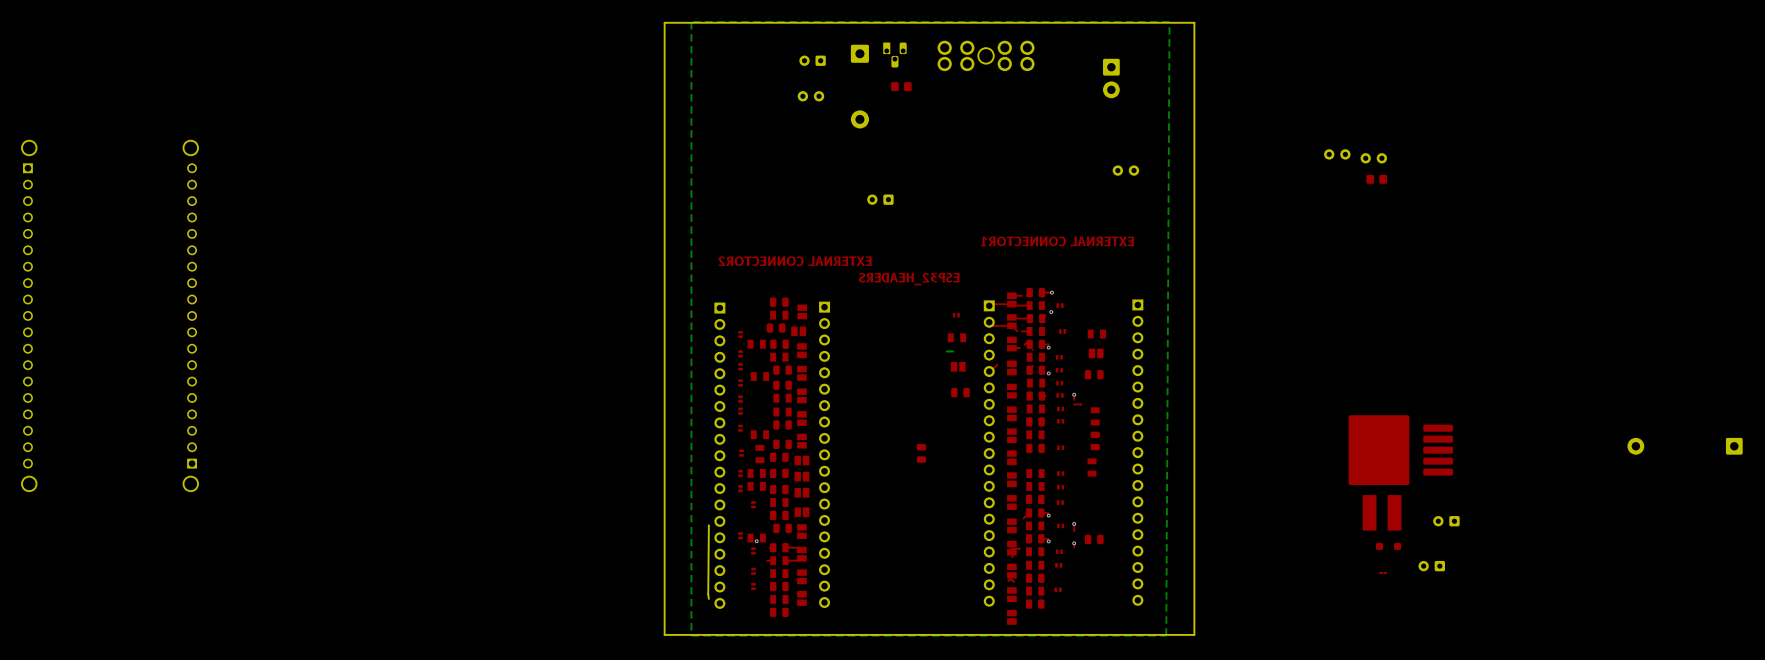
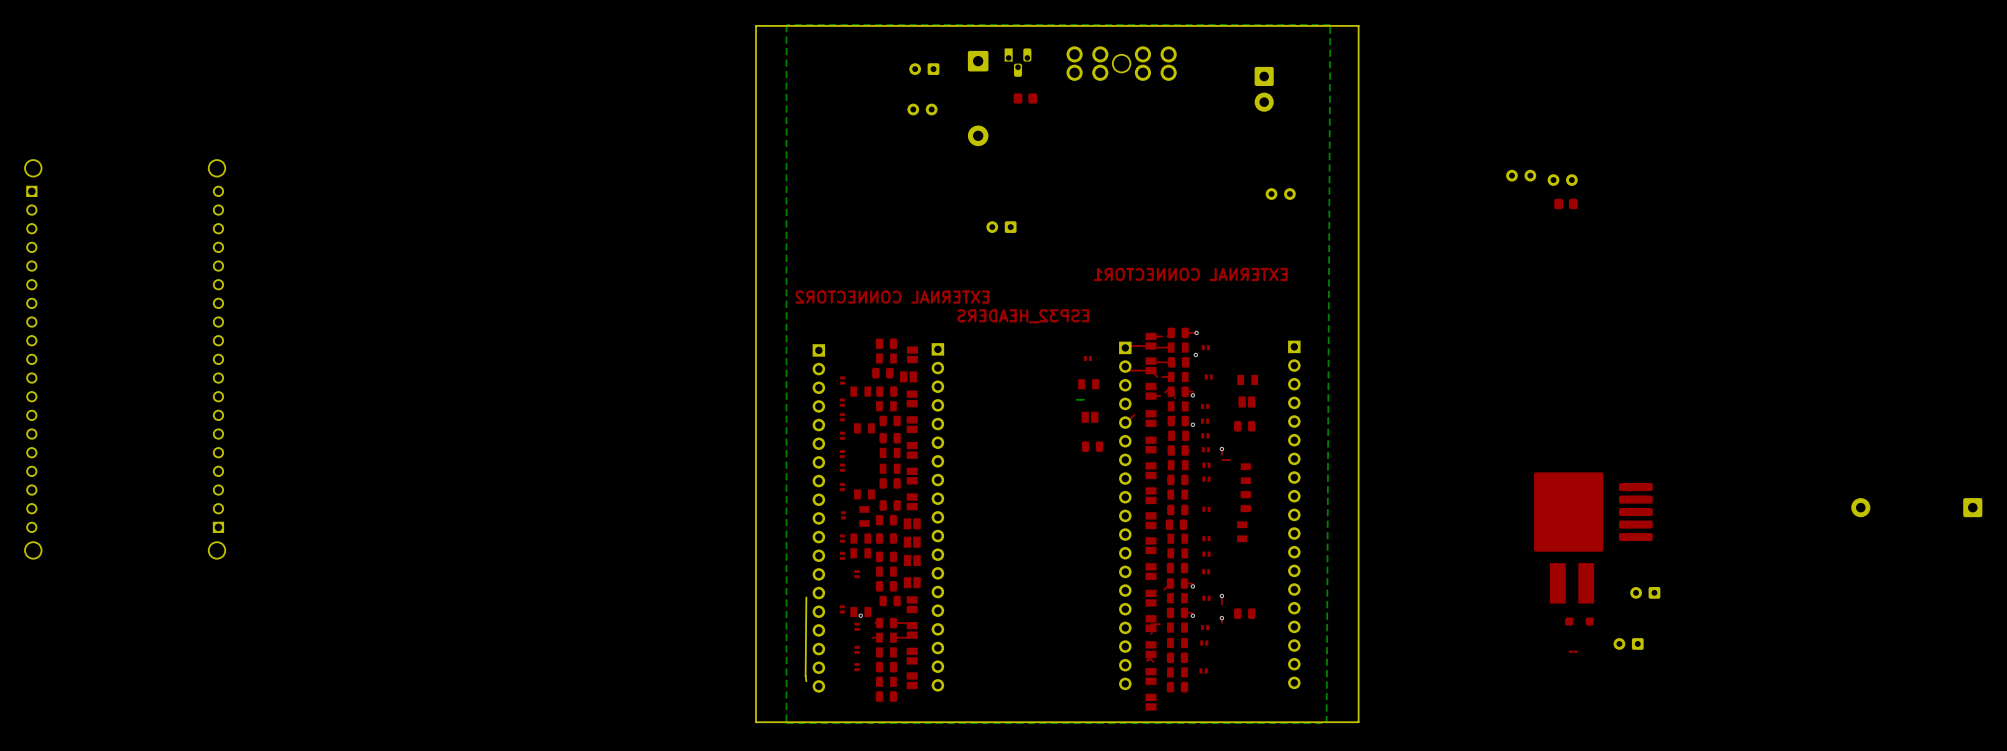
part rotation: 0° (921, 453) -> 90° clockwise (1176, 524)
part position: (921, 453) -> (1176, 524)

